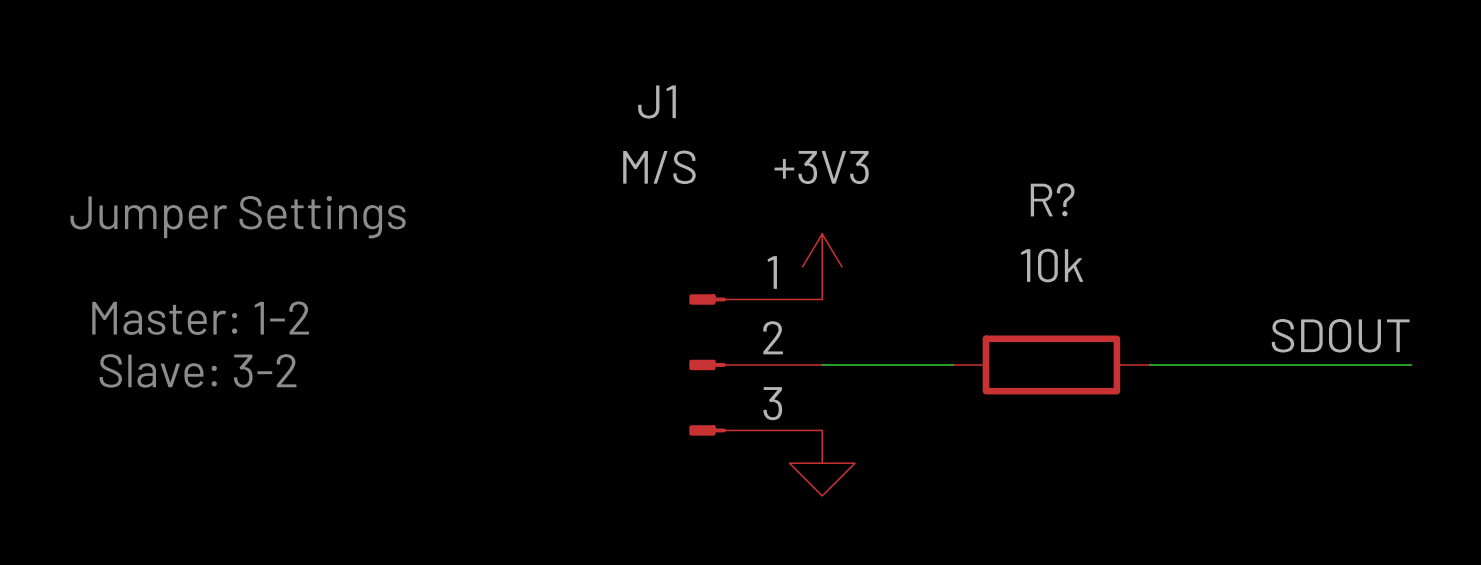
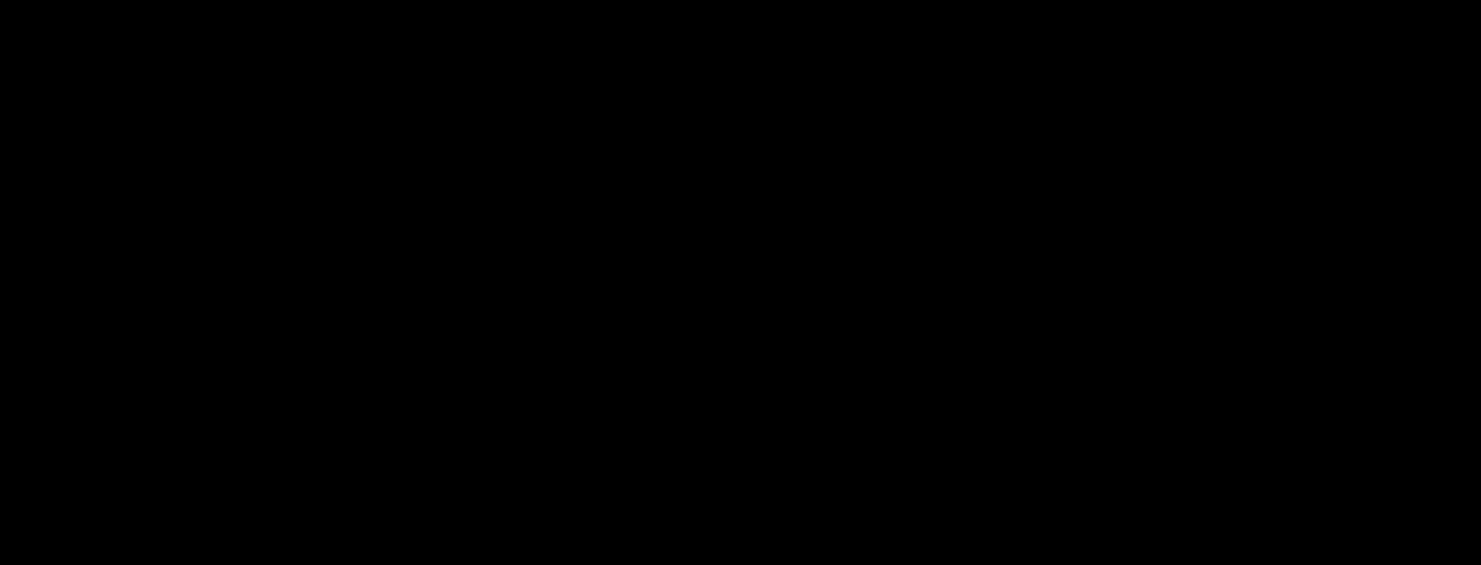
text: Jumper Settings (238, 217) -> none
power symbol: +3V3 (822, 266) -> none
text: Master: 1-2 (200, 318) -> none
label: SDOUT (1340, 335) -> none
J1: M/S (755, 364) -> none
wire: (822, 364) (953, 364) -> none
R?: 10k (1051, 364) -> none
wire: (1149, 364) (1411, 364) -> none
text: Slave: 3-2 (198, 370) -> none
power symbol: (822, 463) -> none

